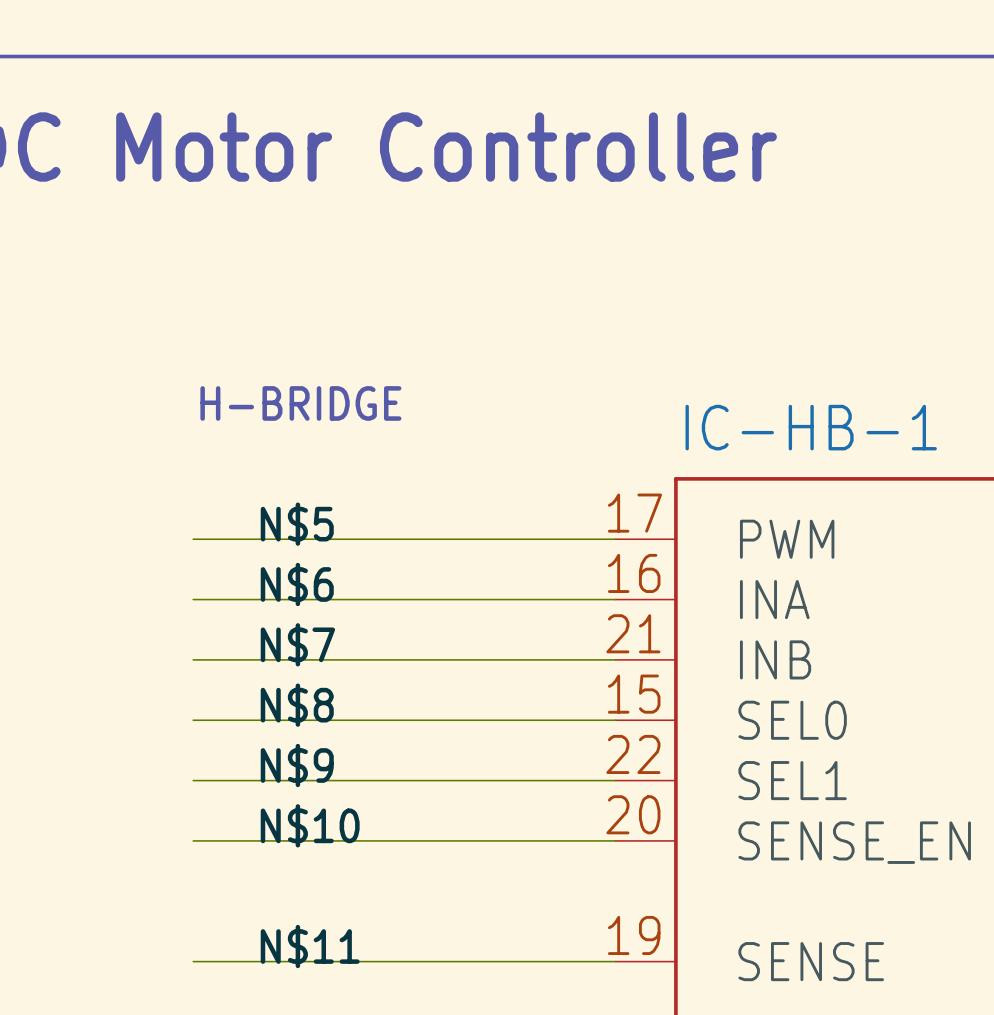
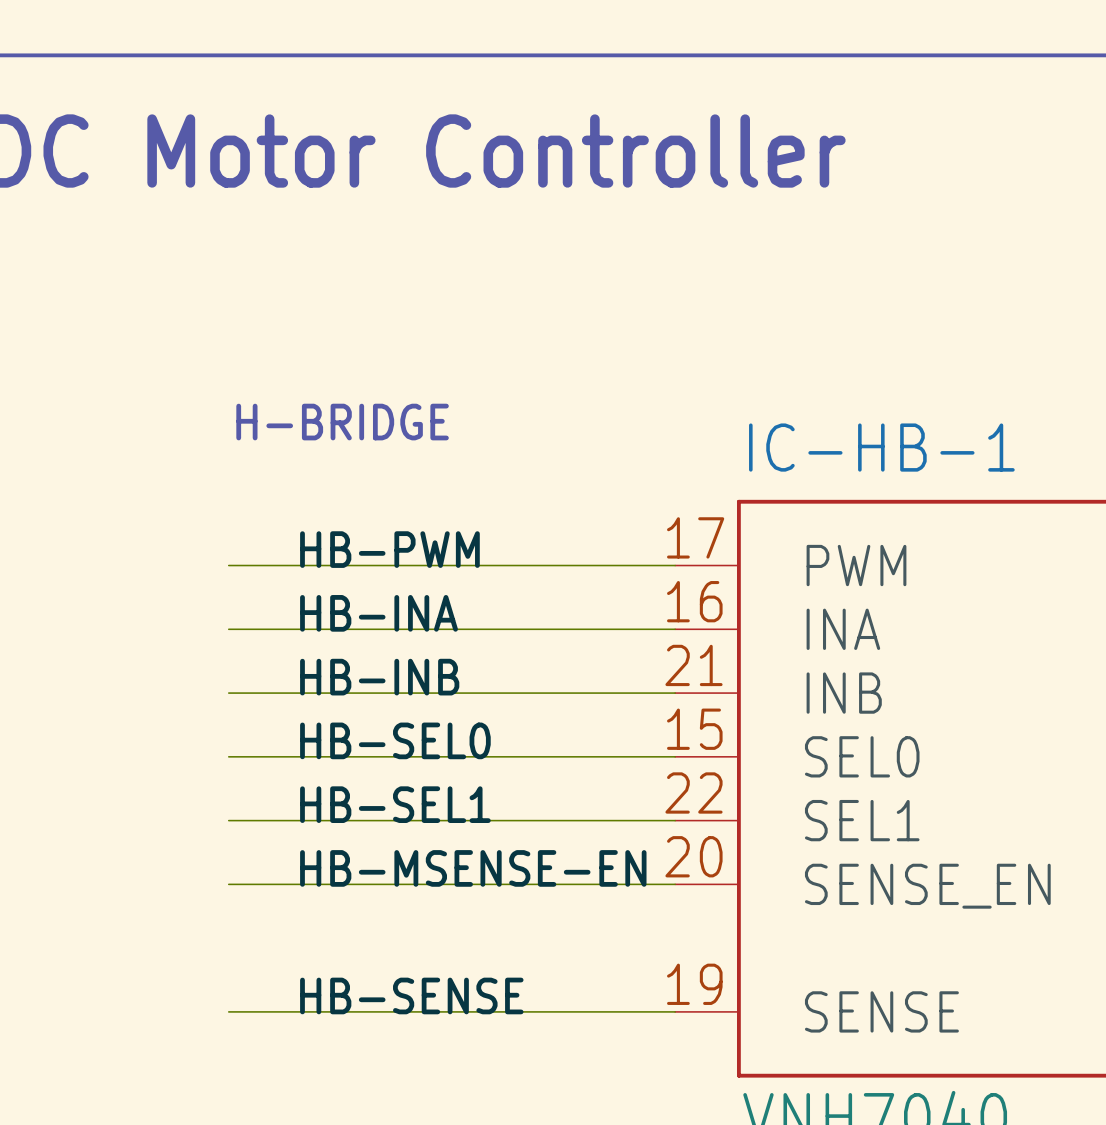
label: N$5 (297, 524) -> HB-PWM (389, 549)
label: N$6 (297, 584) -> HB-INA (379, 613)
label: N$7 (297, 644) -> HB-INB (379, 677)
label: N$8 (297, 705) -> HB-SEL0 (395, 740)
label: N$9 (297, 765) -> HB-SEL1 (395, 804)
label: N$10 (310, 825) -> HB-MSENSE-EN (473, 868)
label: N$11 (310, 946) -> HB-SENSE (411, 995)

